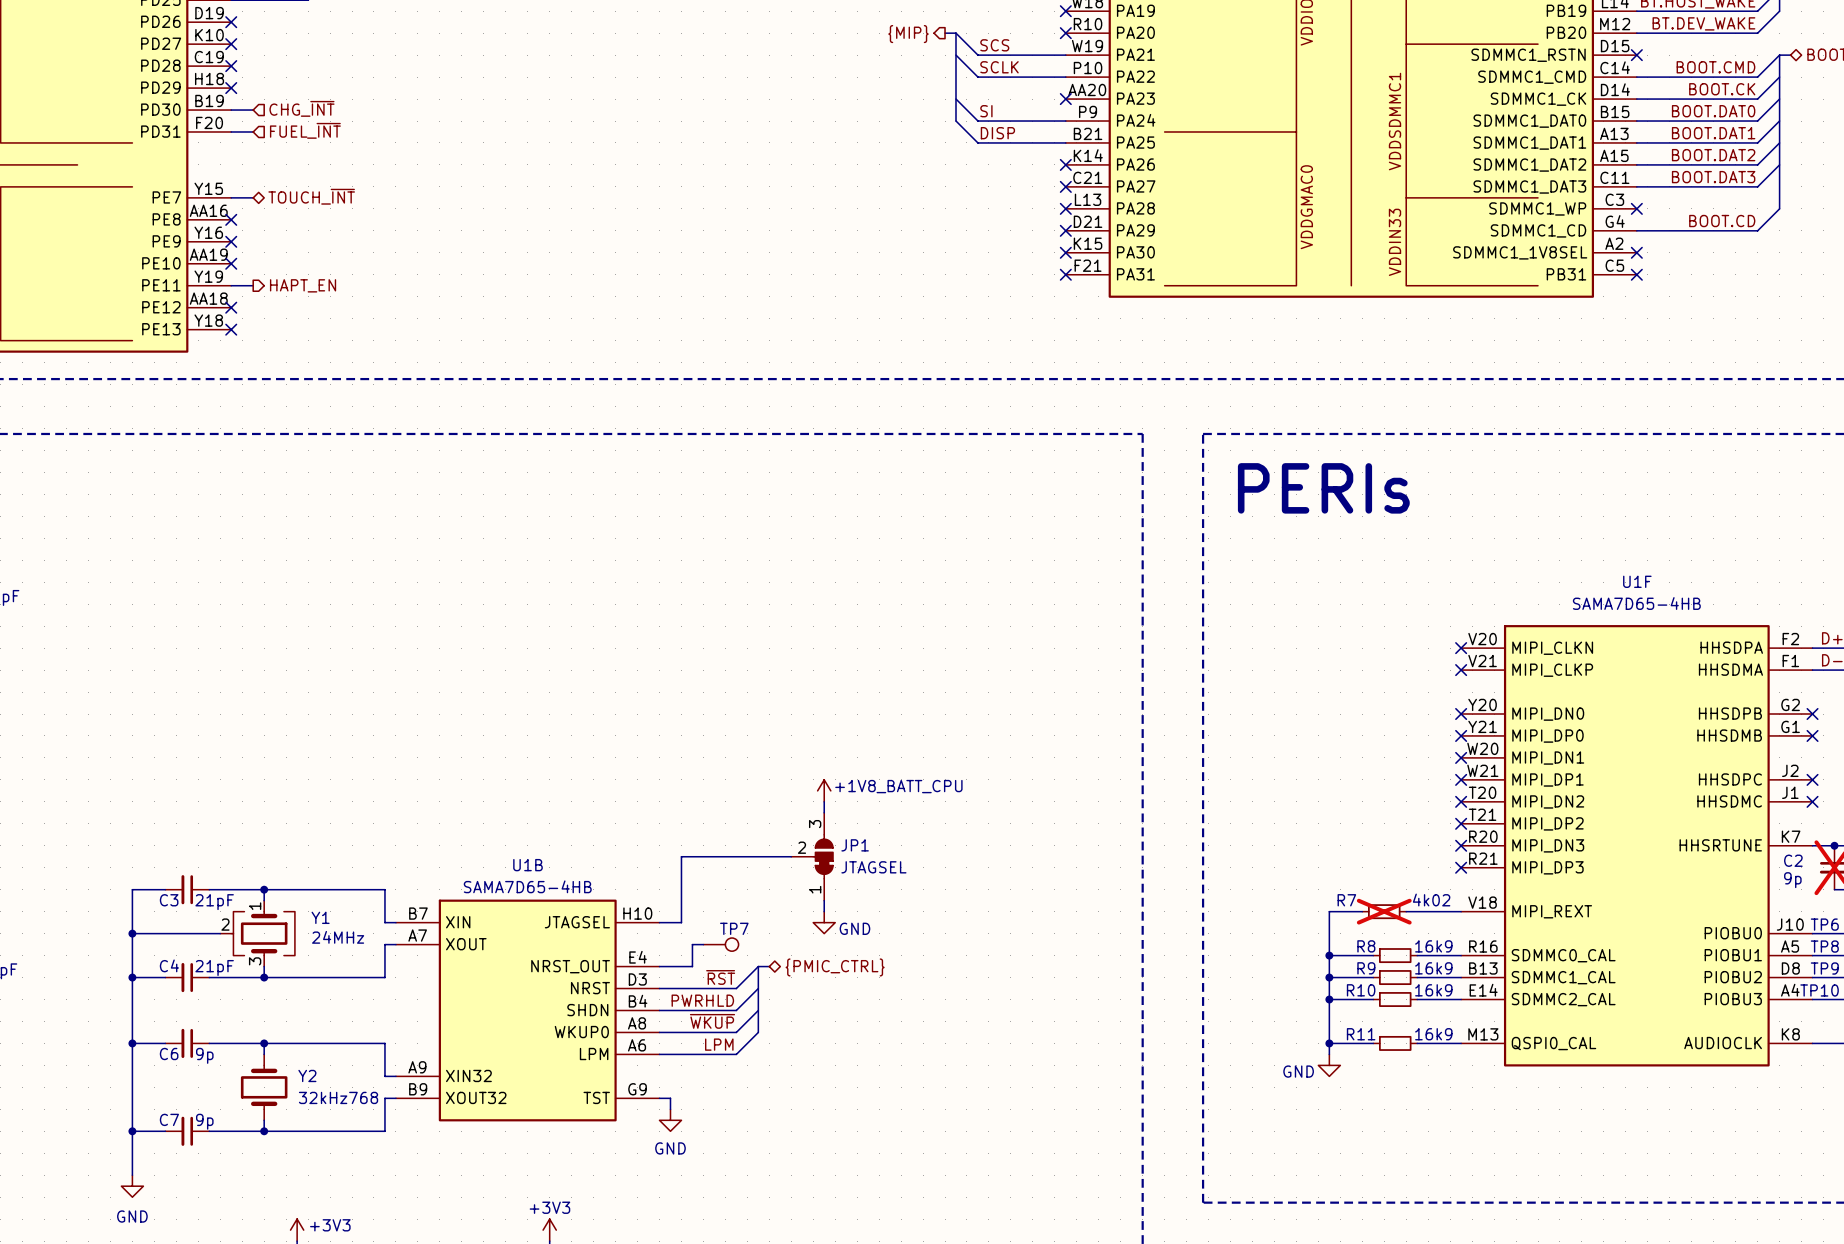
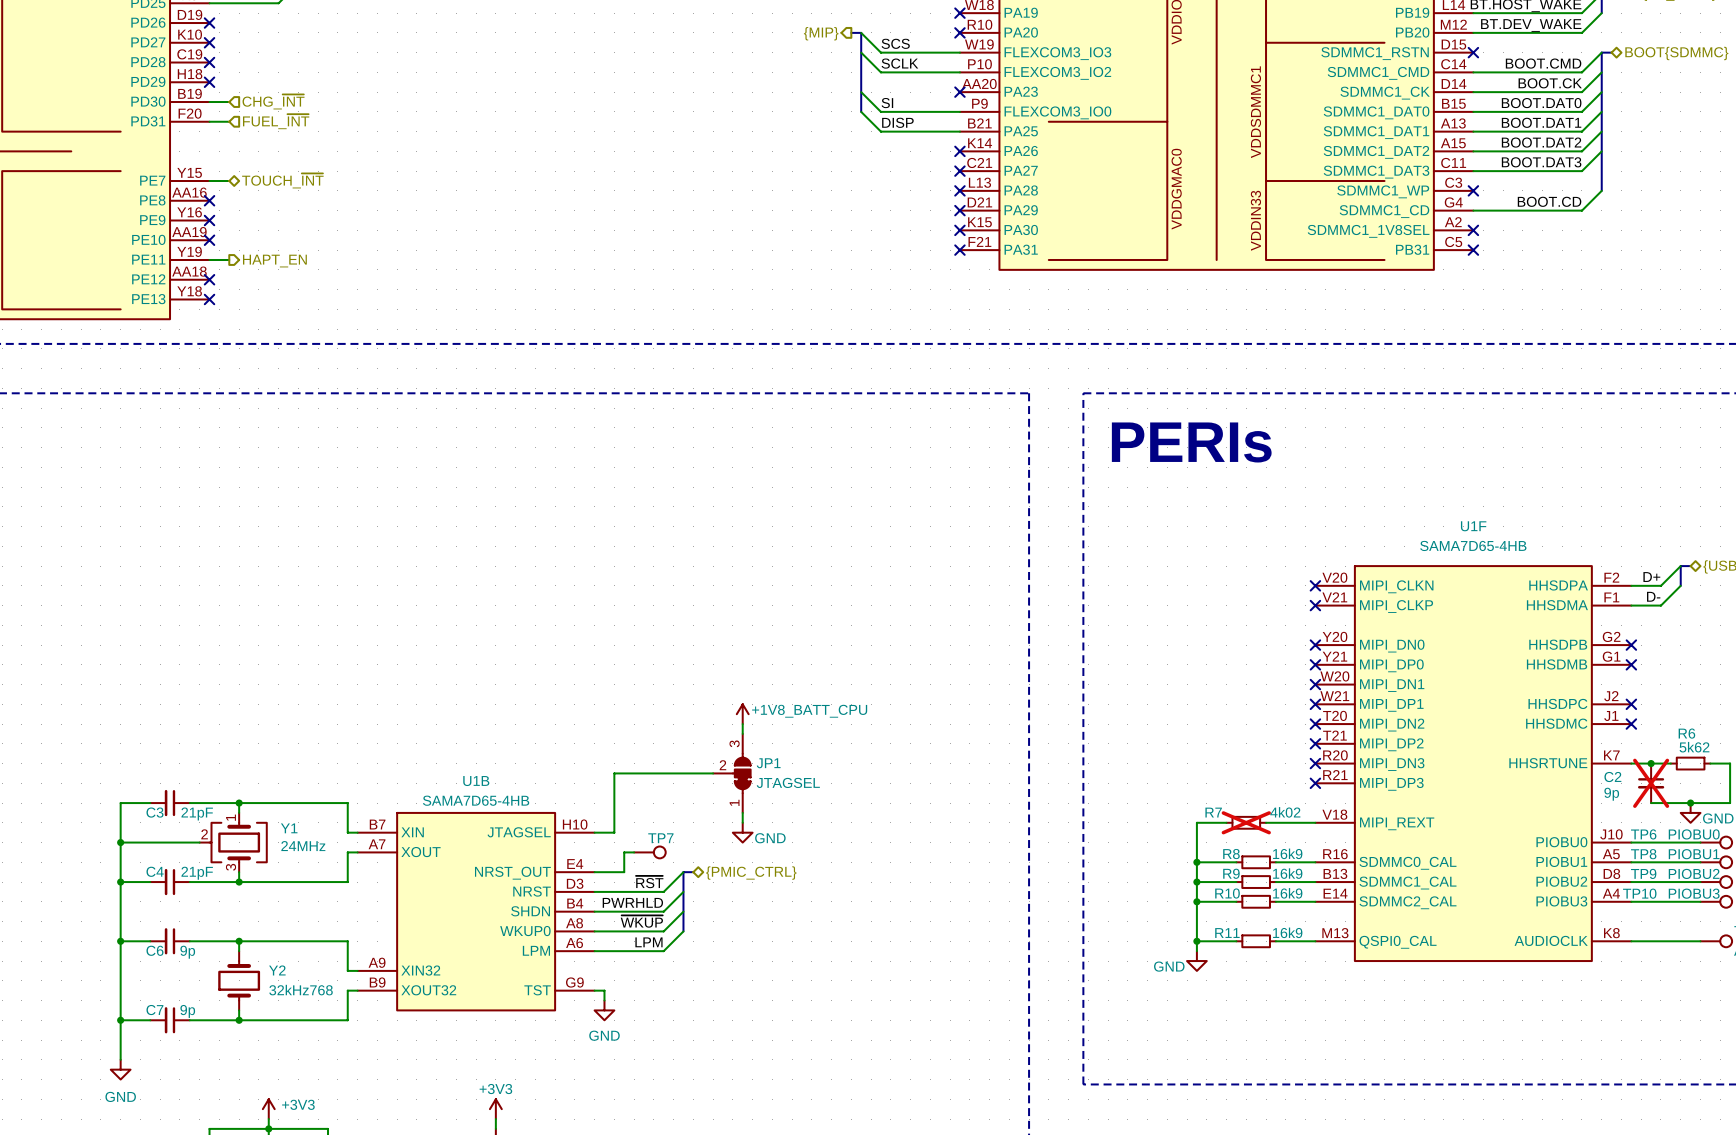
part pin name: PA21 (1135, 54) -> FLEXCOM3_IO3 (1057, 53)
part pin name: PA22 (1135, 76) -> FLEXCOM3_IO2 (1057, 73)
part pin name: PA24 (1136, 120) -> FLEXCOM3_IO0 (1057, 112)

